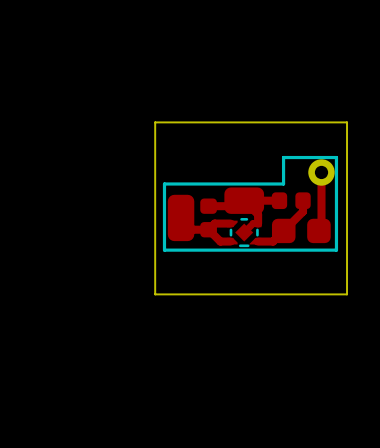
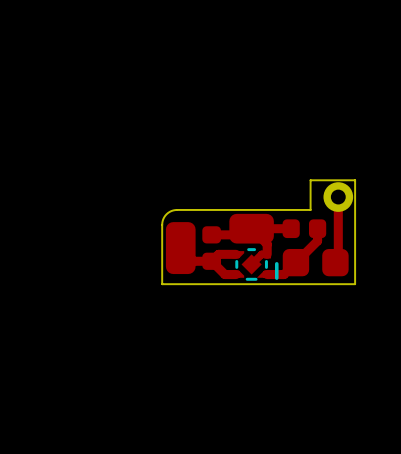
board edge: (155, 122) (155, 294) (347, 294) (347, 122) (155, 122) -> none
line: (283, 157) (283, 183) (164, 183) (164, 250) (336, 250) (336, 157) (283, 157) -> none
board edge: none -> (310, 180) (310, 209) (177, 209) (167, 213) (162, 222) (162, 284) (355, 284) (355, 180) (310, 180)
line: none -> (276, 263) (276, 278)

